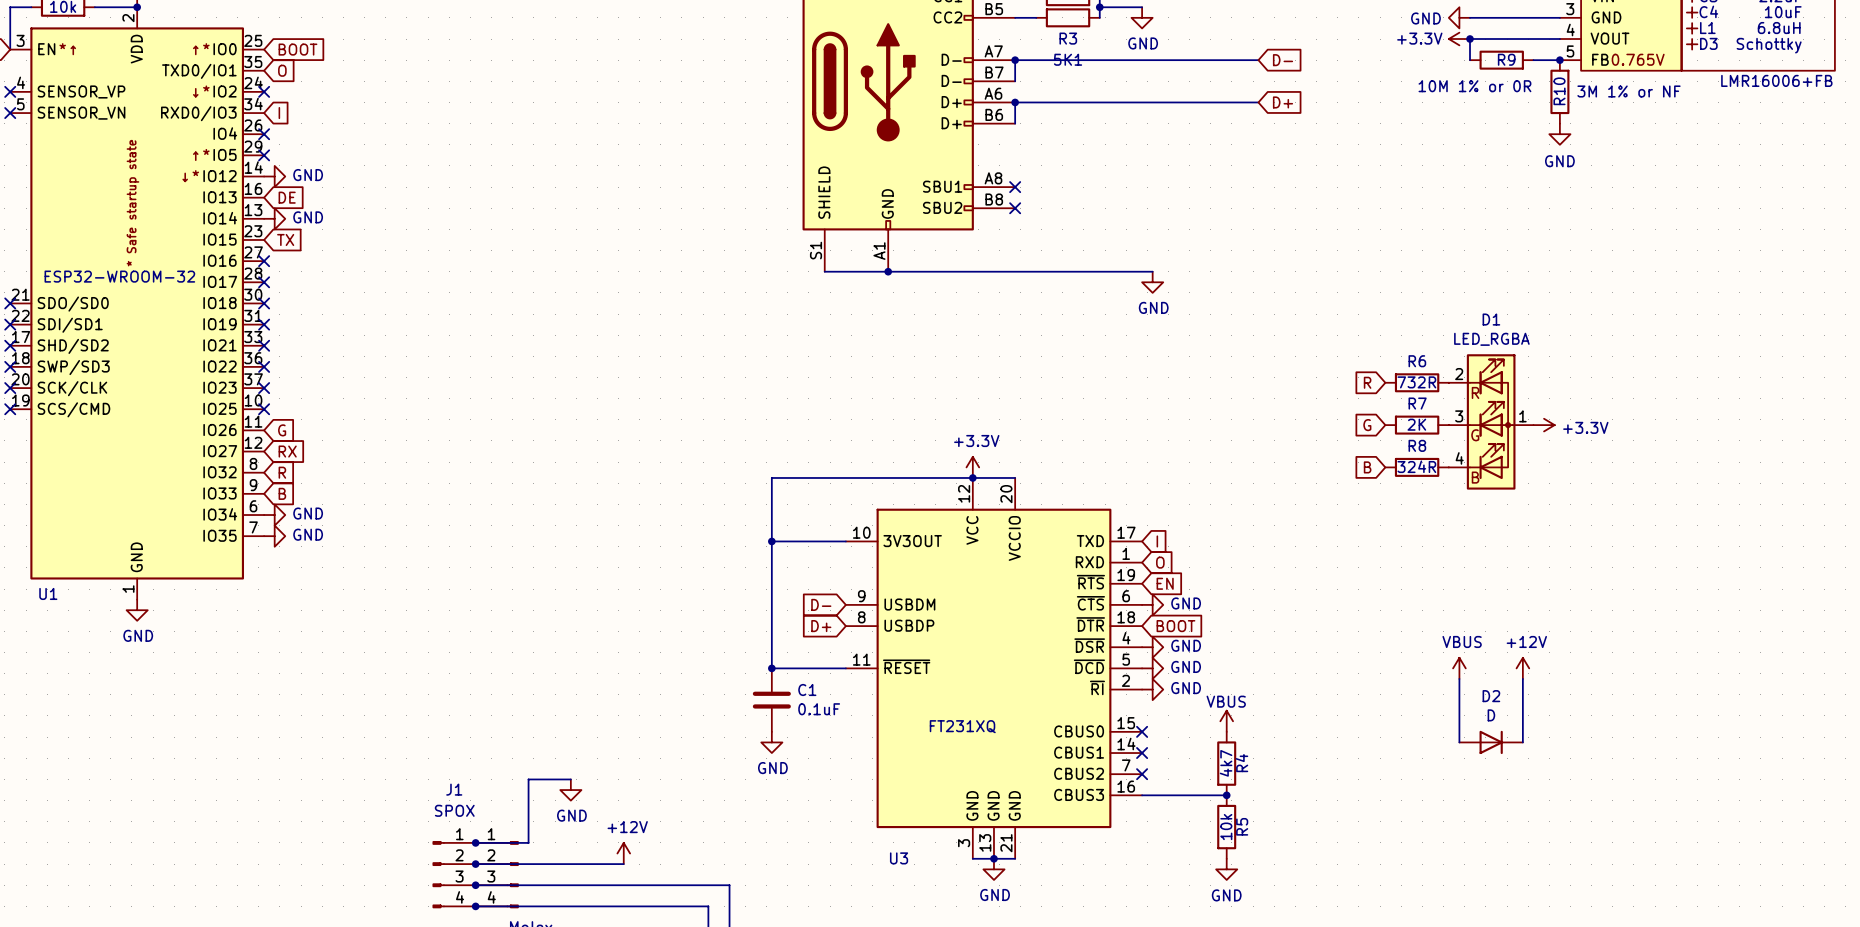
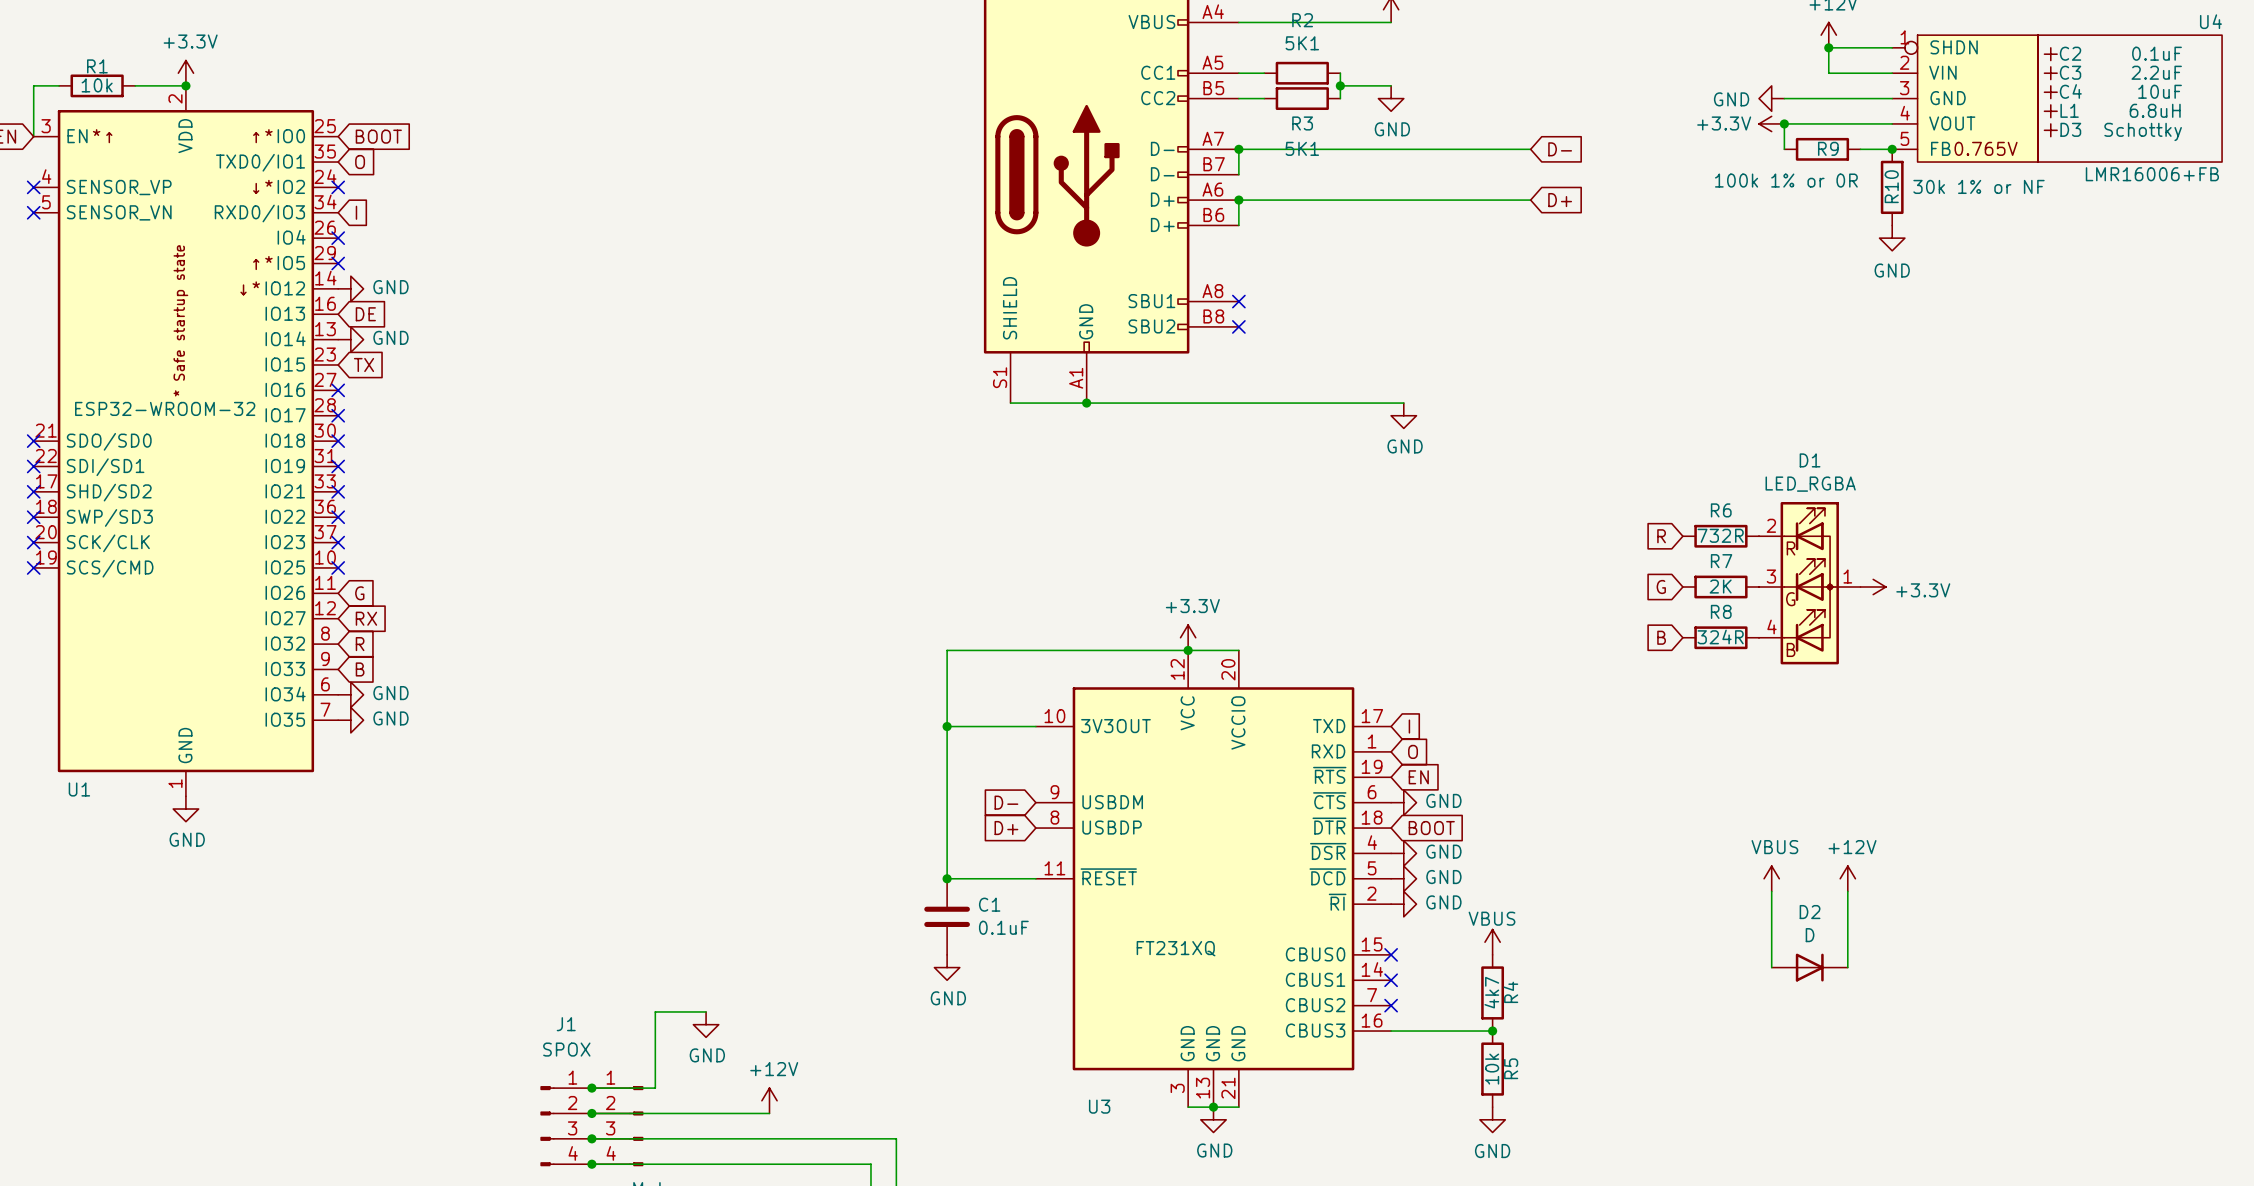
R9 value: 10M 1% or 0R (1474, 86) -> 100k 1% or 0R (1786, 180)
R10 value: 3M 1% or NF (1629, 91) -> 30k 1% or NF (1978, 186)

